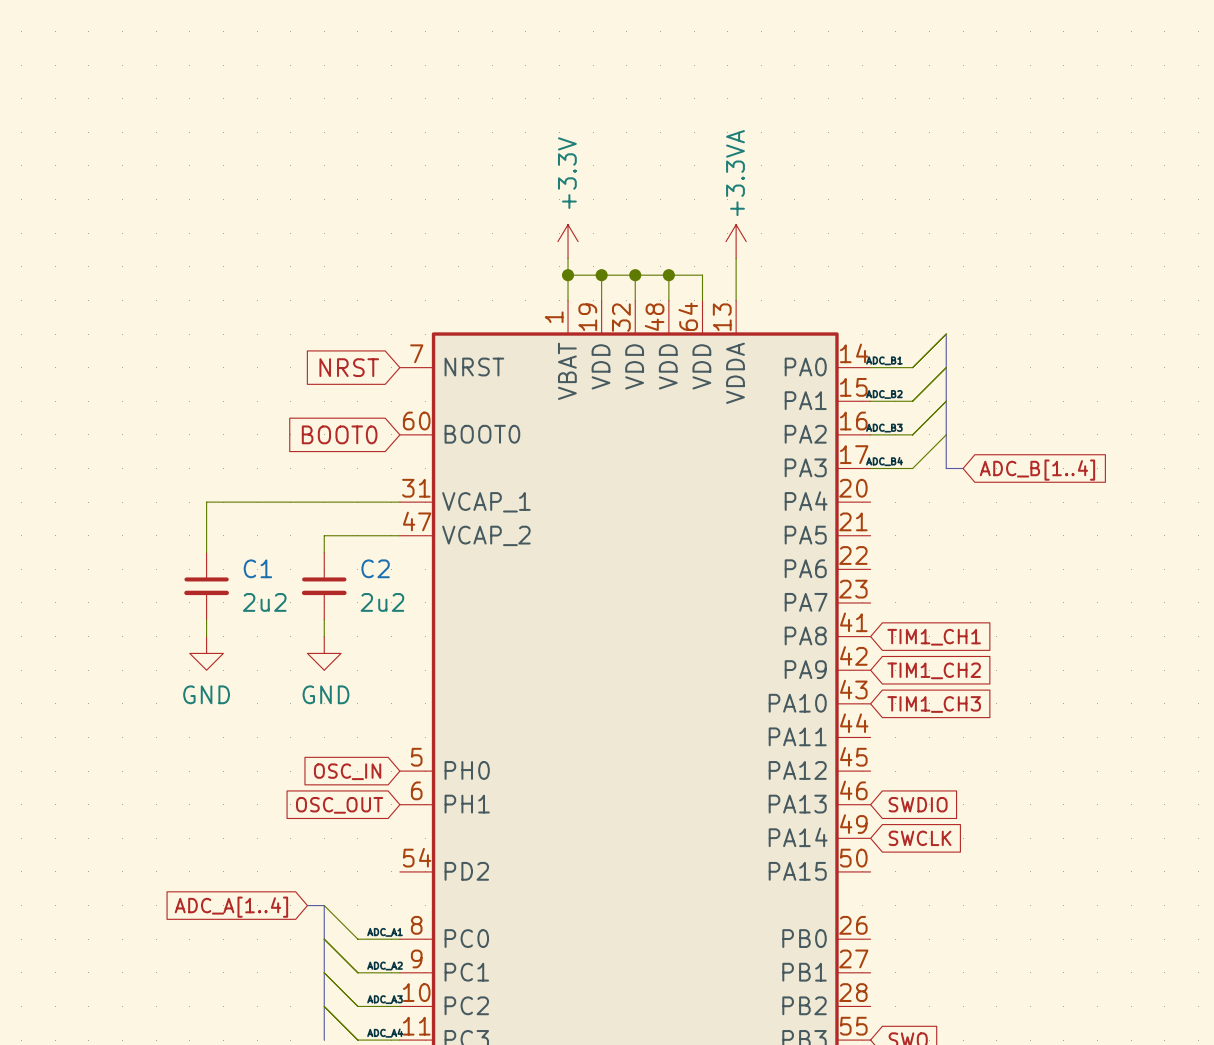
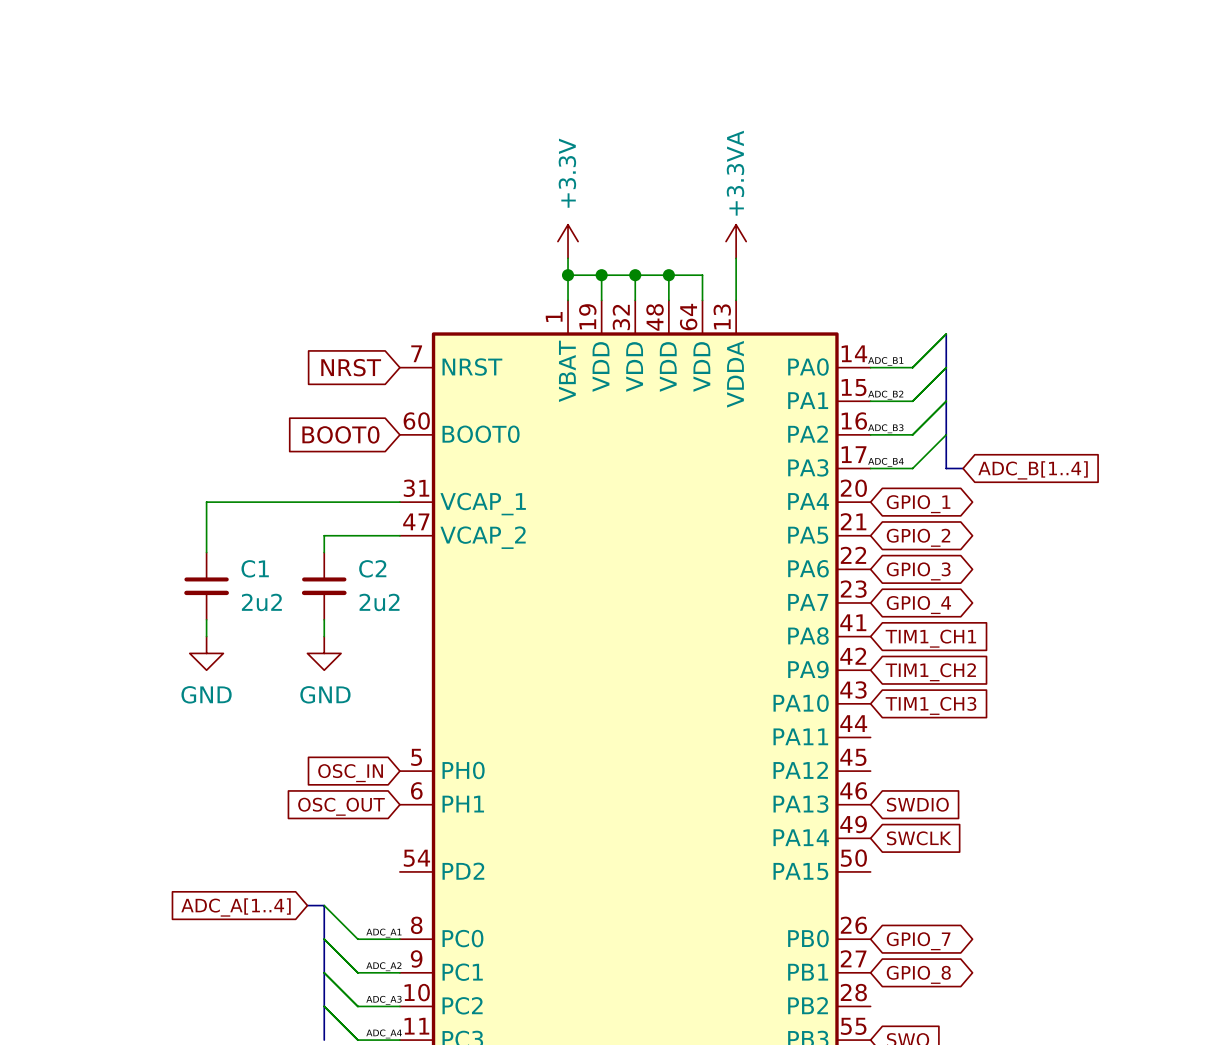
global label: none -> GPIO_1 (918, 504)
global label: none -> GPIO_2 (918, 537)
global label: none -> GPIO_3 (918, 571)
global label: none -> GPIO_4 (918, 605)
global label: none -> GPIO_7 (918, 941)
global label: none -> GPIO_8 (918, 974)

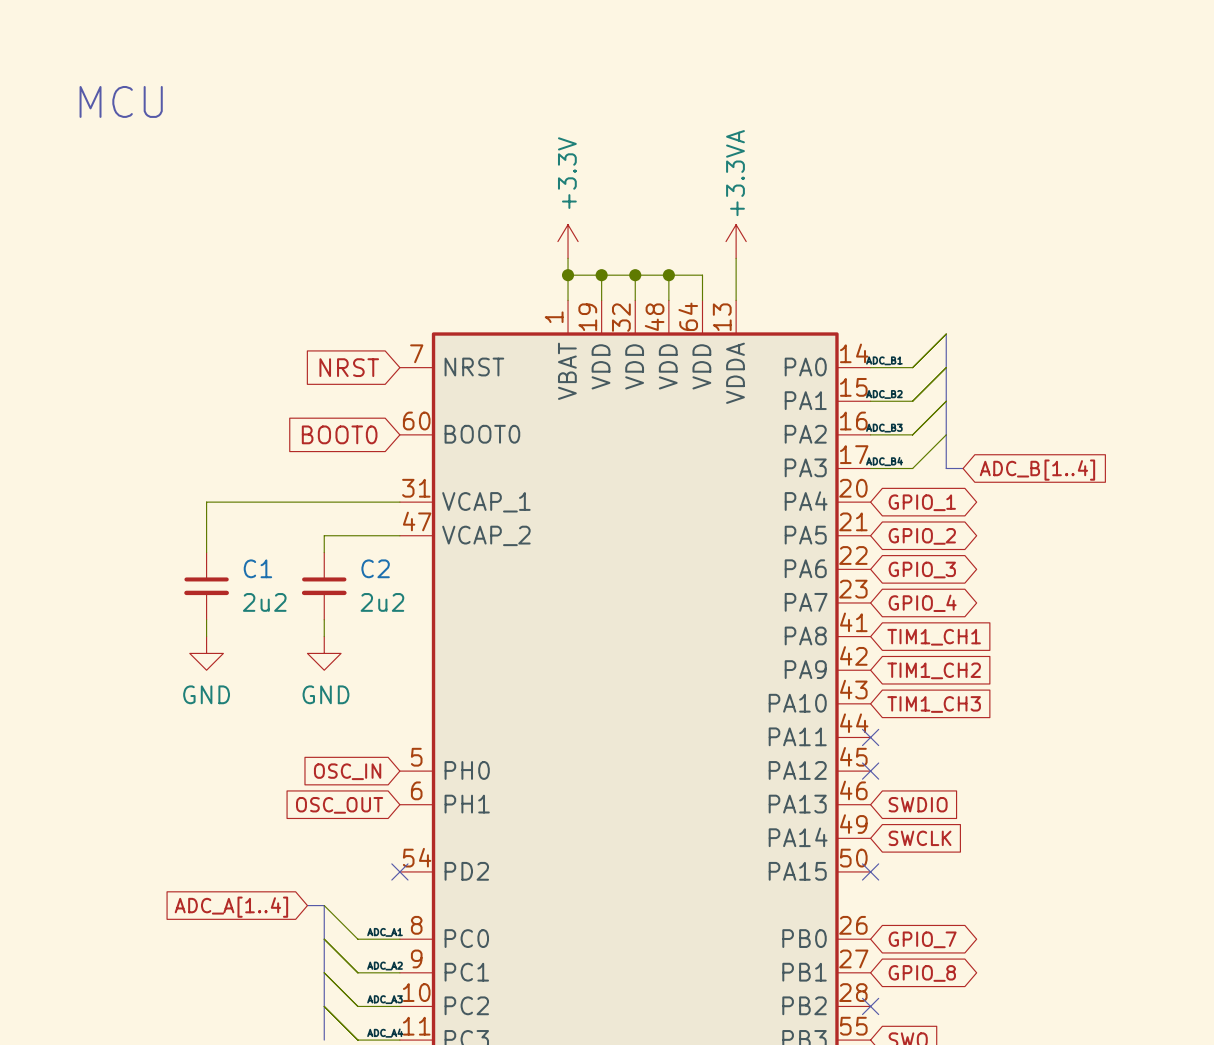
text: none -> MCU (121, 101)
no-connect mark: none -> (870, 737)
no-connect mark: none -> (870, 771)
no-connect mark: none -> (399, 871)
no-connect mark: none -> (870, 871)
no-connect mark: none -> (870, 1006)

